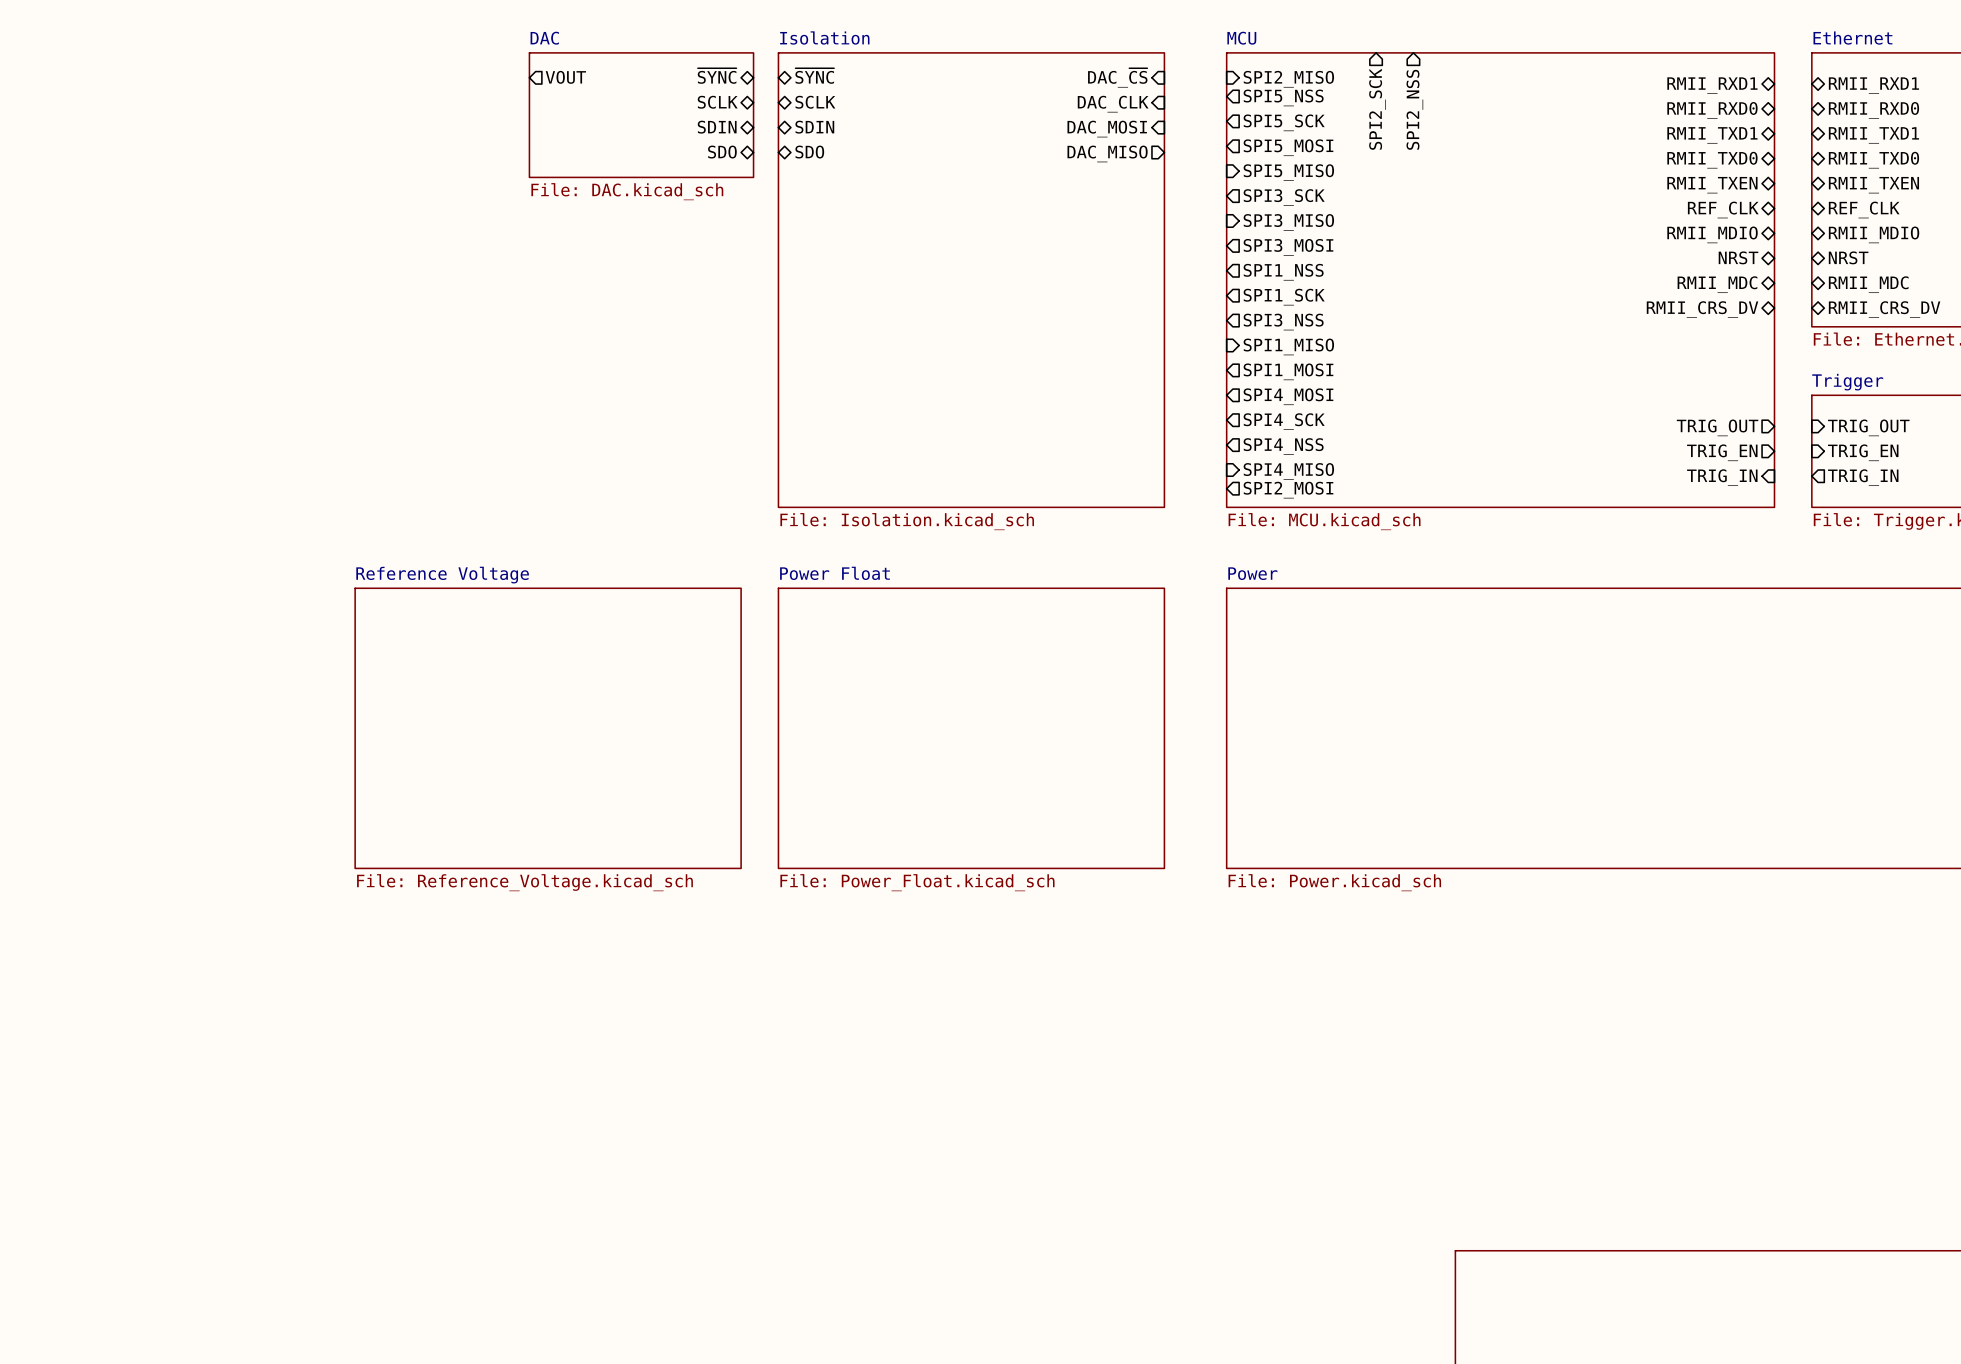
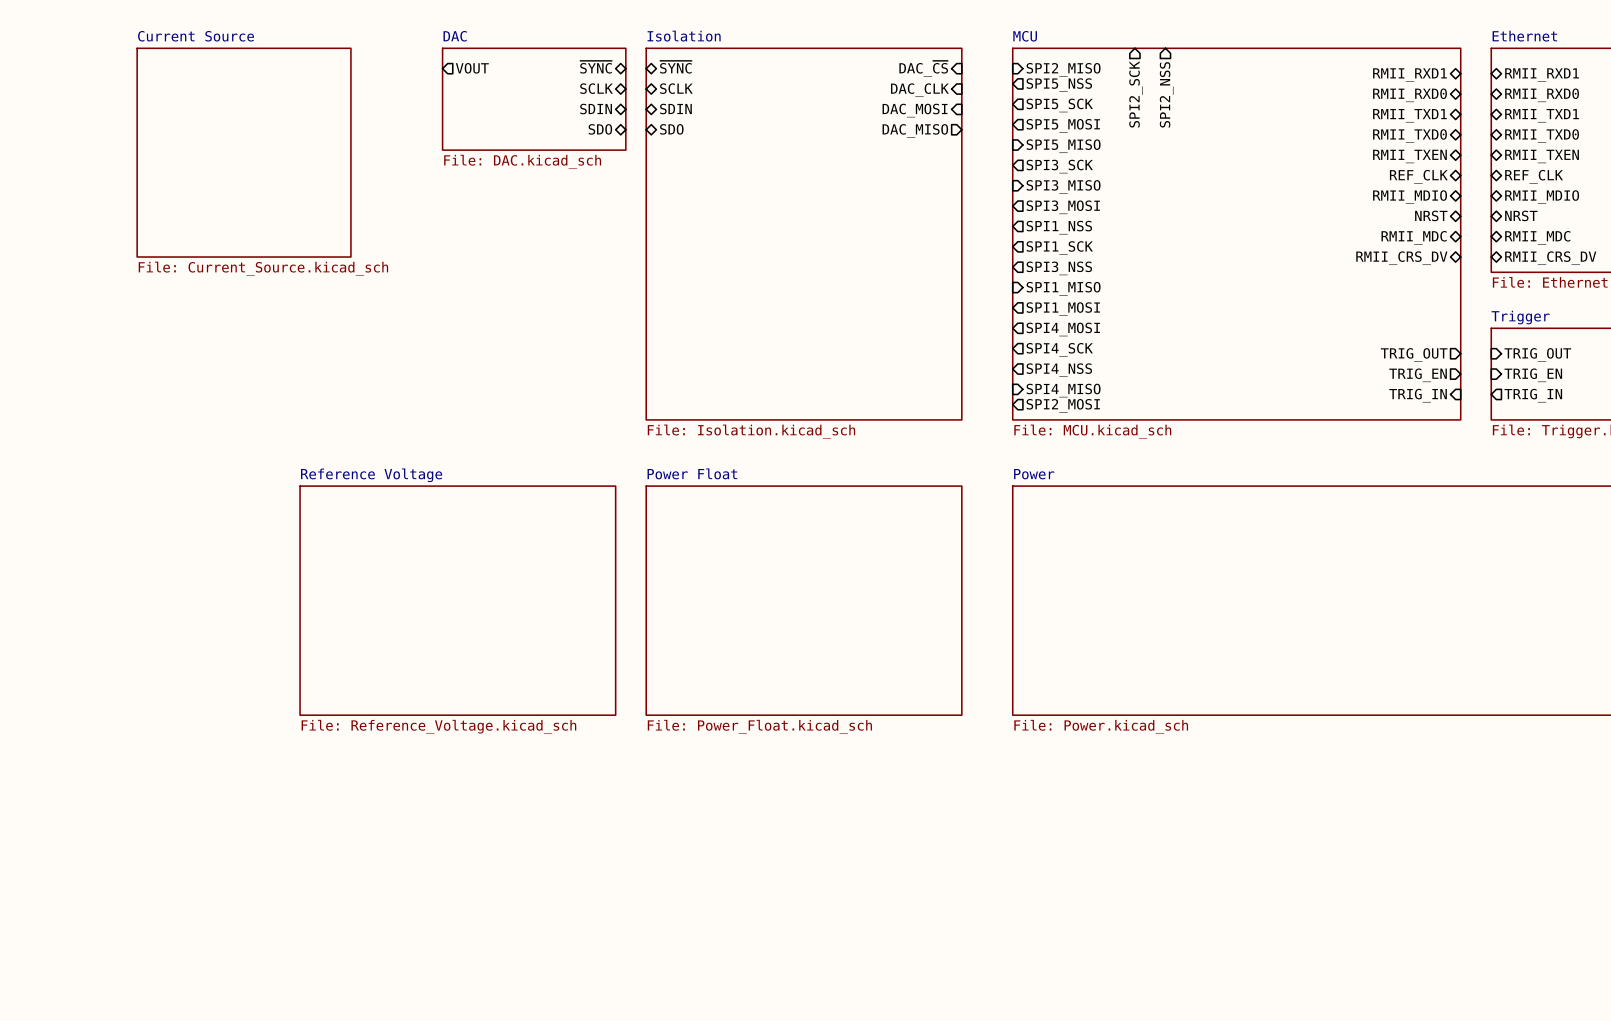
sheet Current Source: none -> File: Current_Source.kicad_sch (244, 152)

